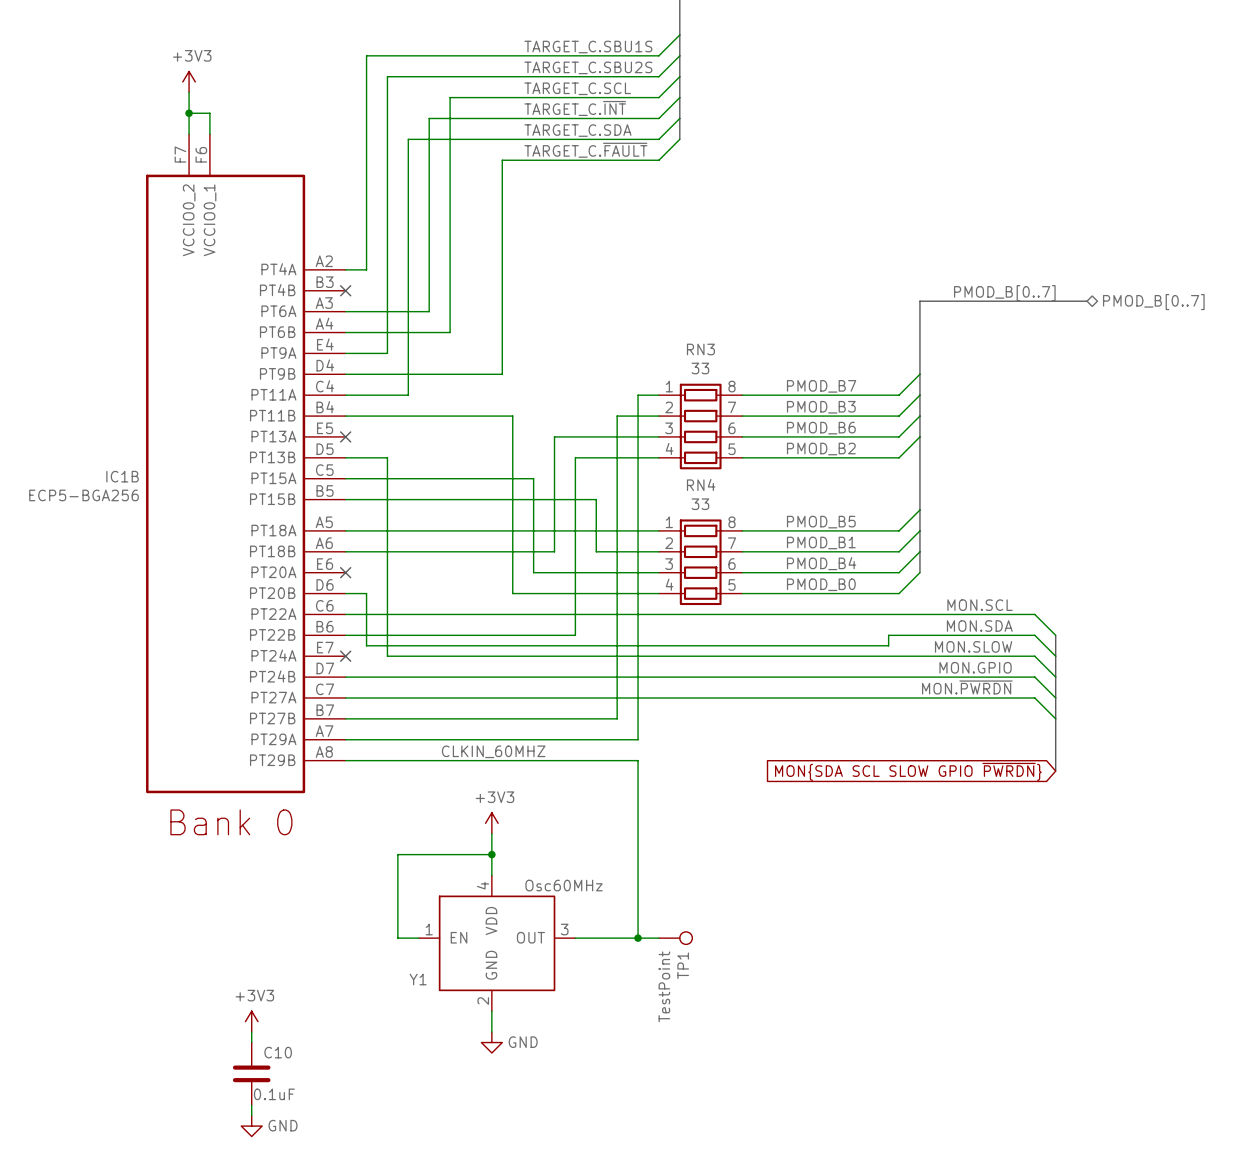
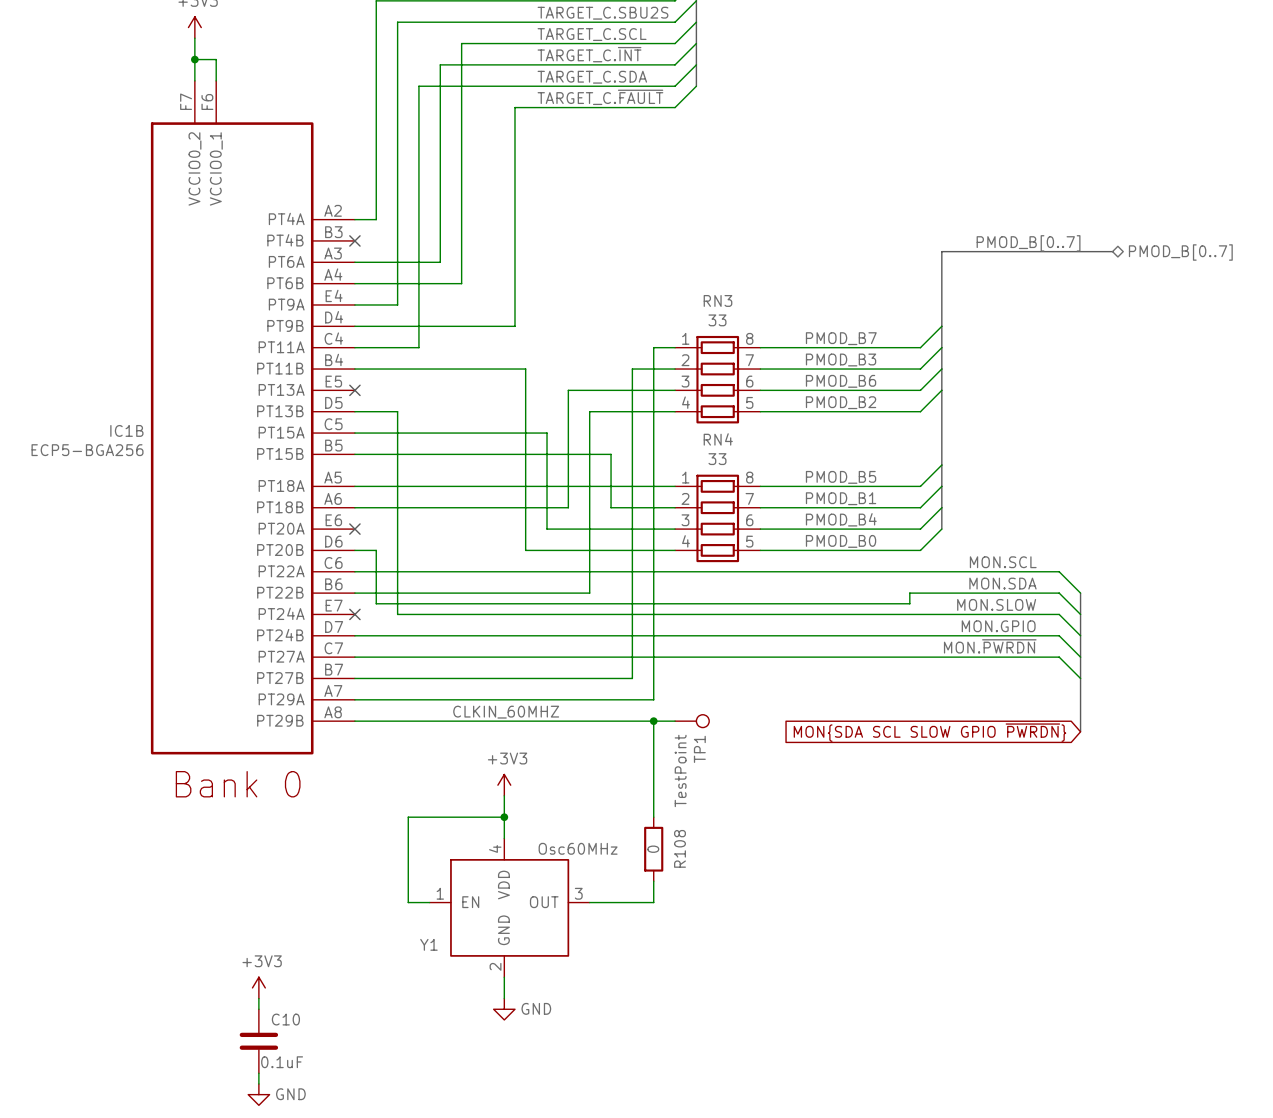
junction: none -> (653, 721)
wire: (638, 854) (638, 917) -> none
R108: none -> 0 (653, 849)
wire: (638, 938) (658, 938) -> (653, 721) (675, 721)
junction: (638, 938) -> none
TP1 position: (675, 938) -> (692, 721)

